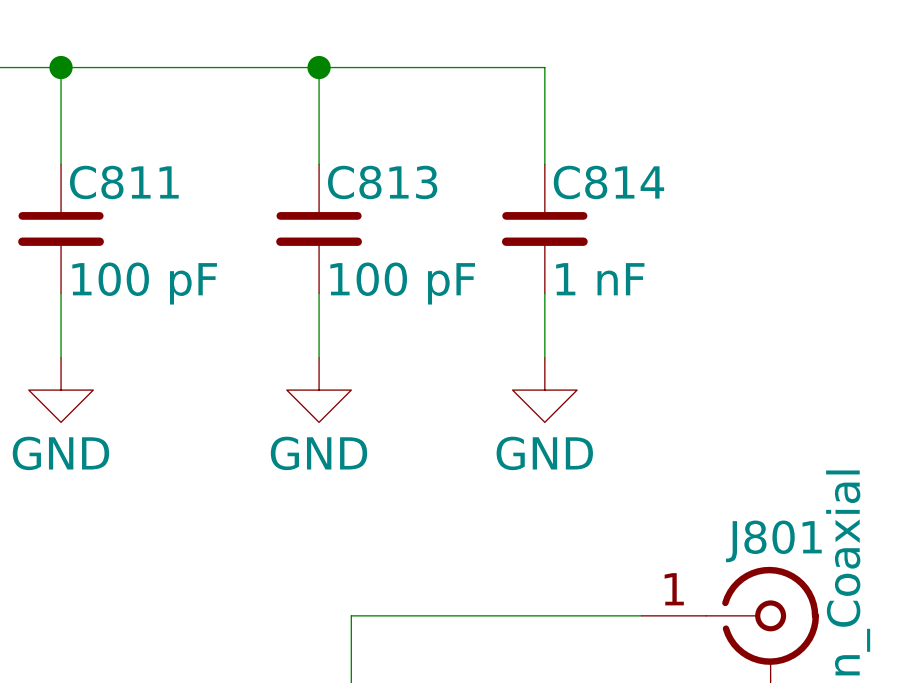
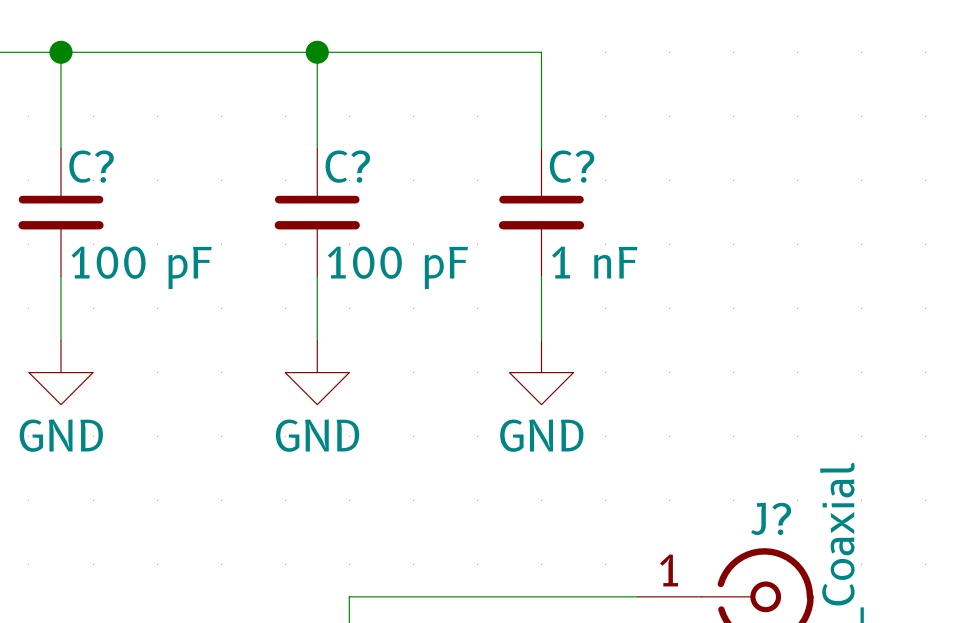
C811 name: C811 (124, 182) -> C? (91, 166)
C813 name: C813 (382, 182) -> C? (347, 166)
C814 name: C814 (608, 182) -> C? (572, 166)
J801 name: J801 (773, 541) -> J? (771, 518)

